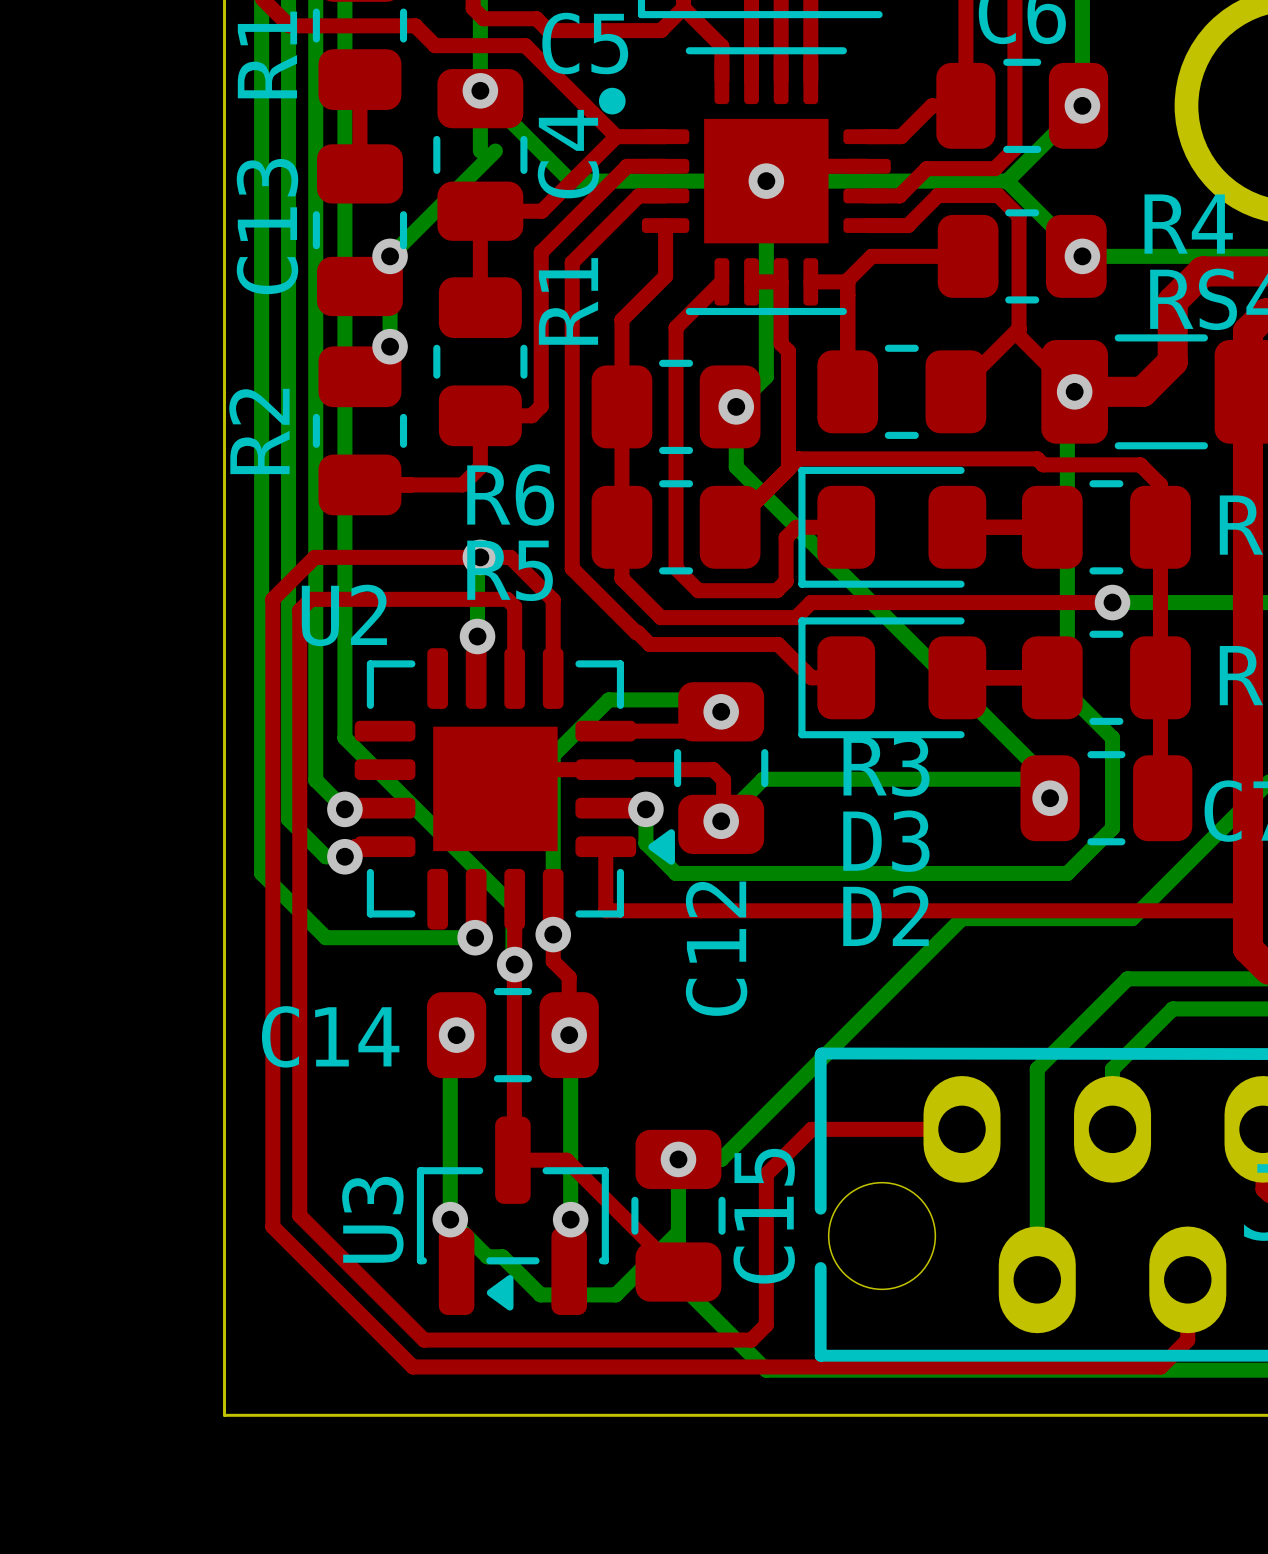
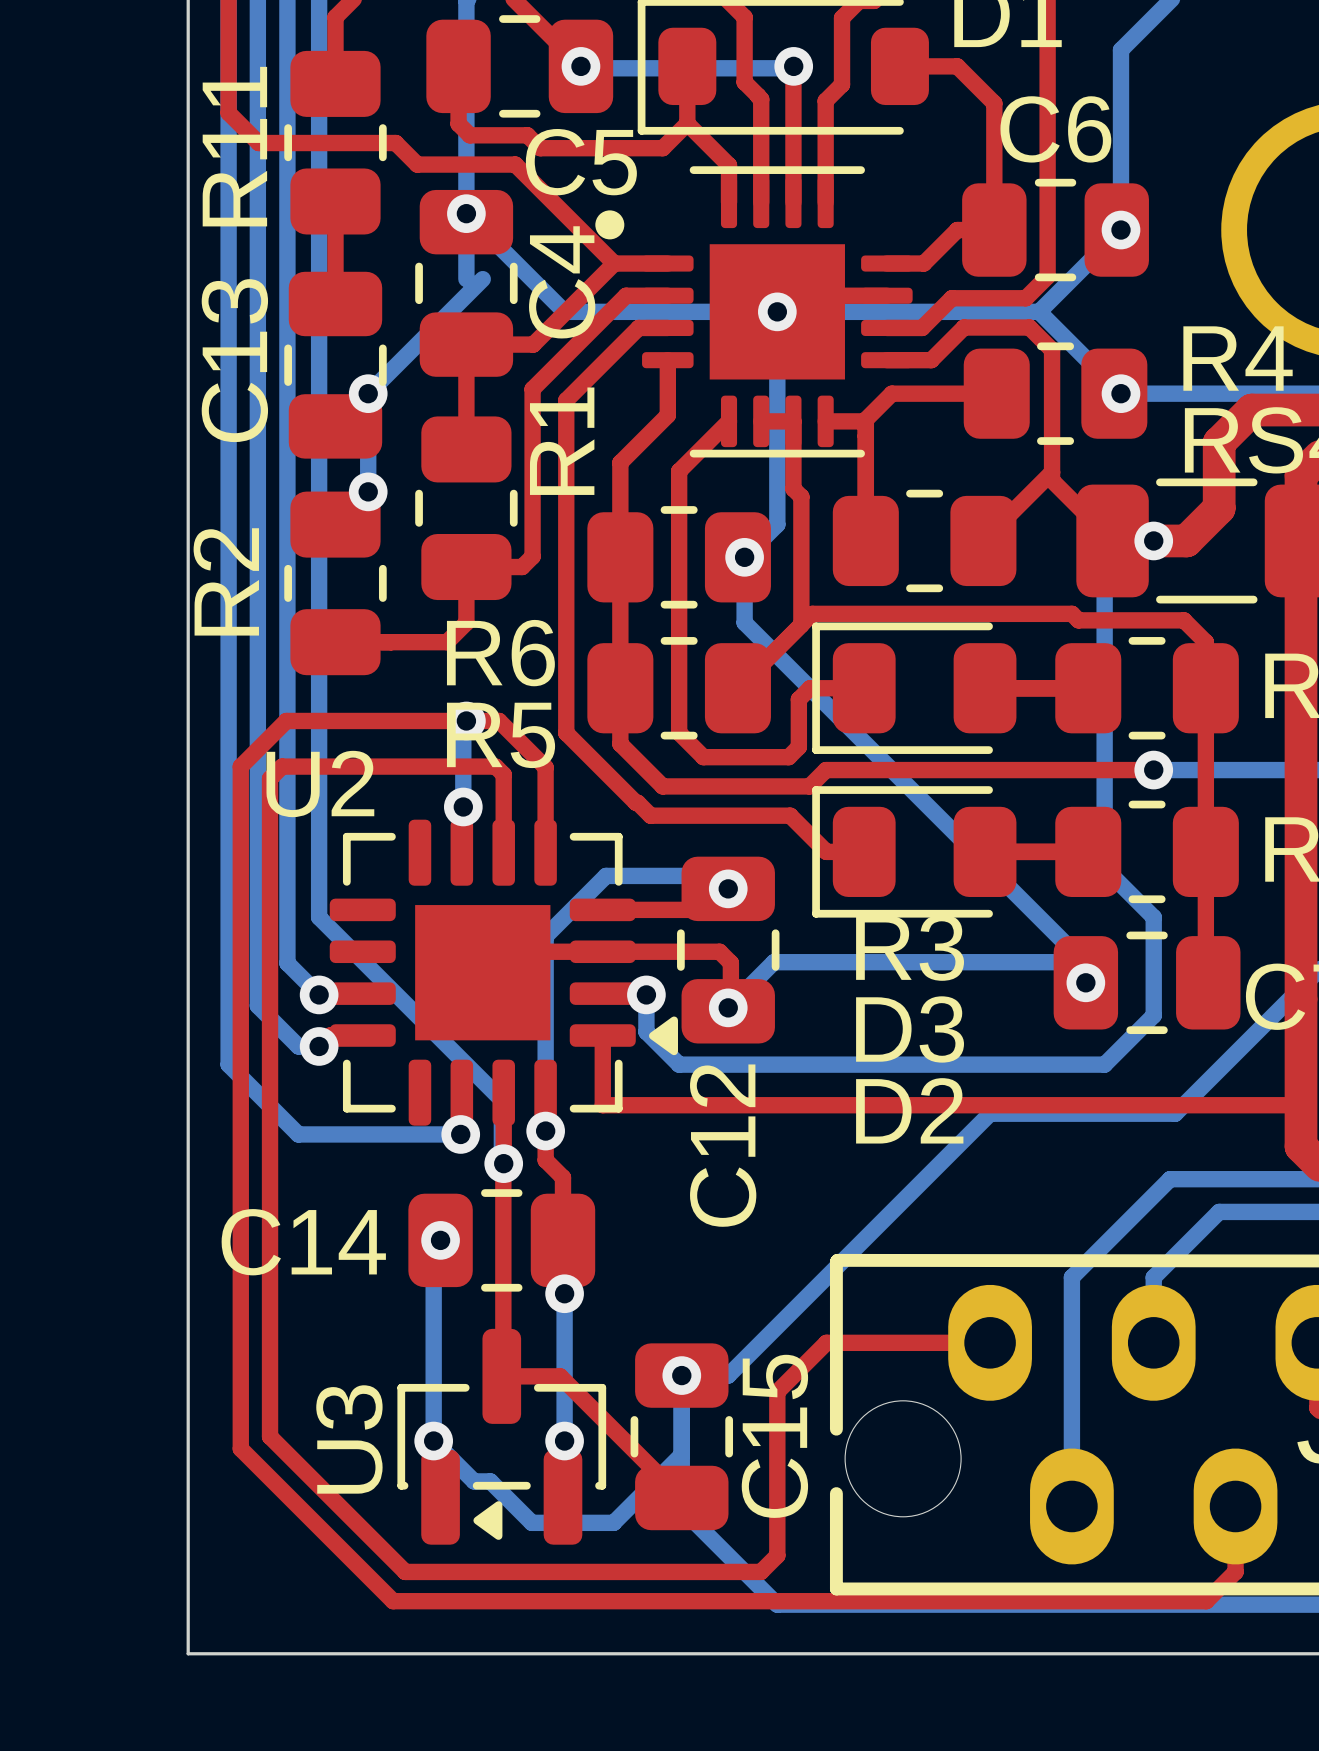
via position: (1074, 391) -> (1153, 540)
via position: (569, 1035) -> (564, 1293)

